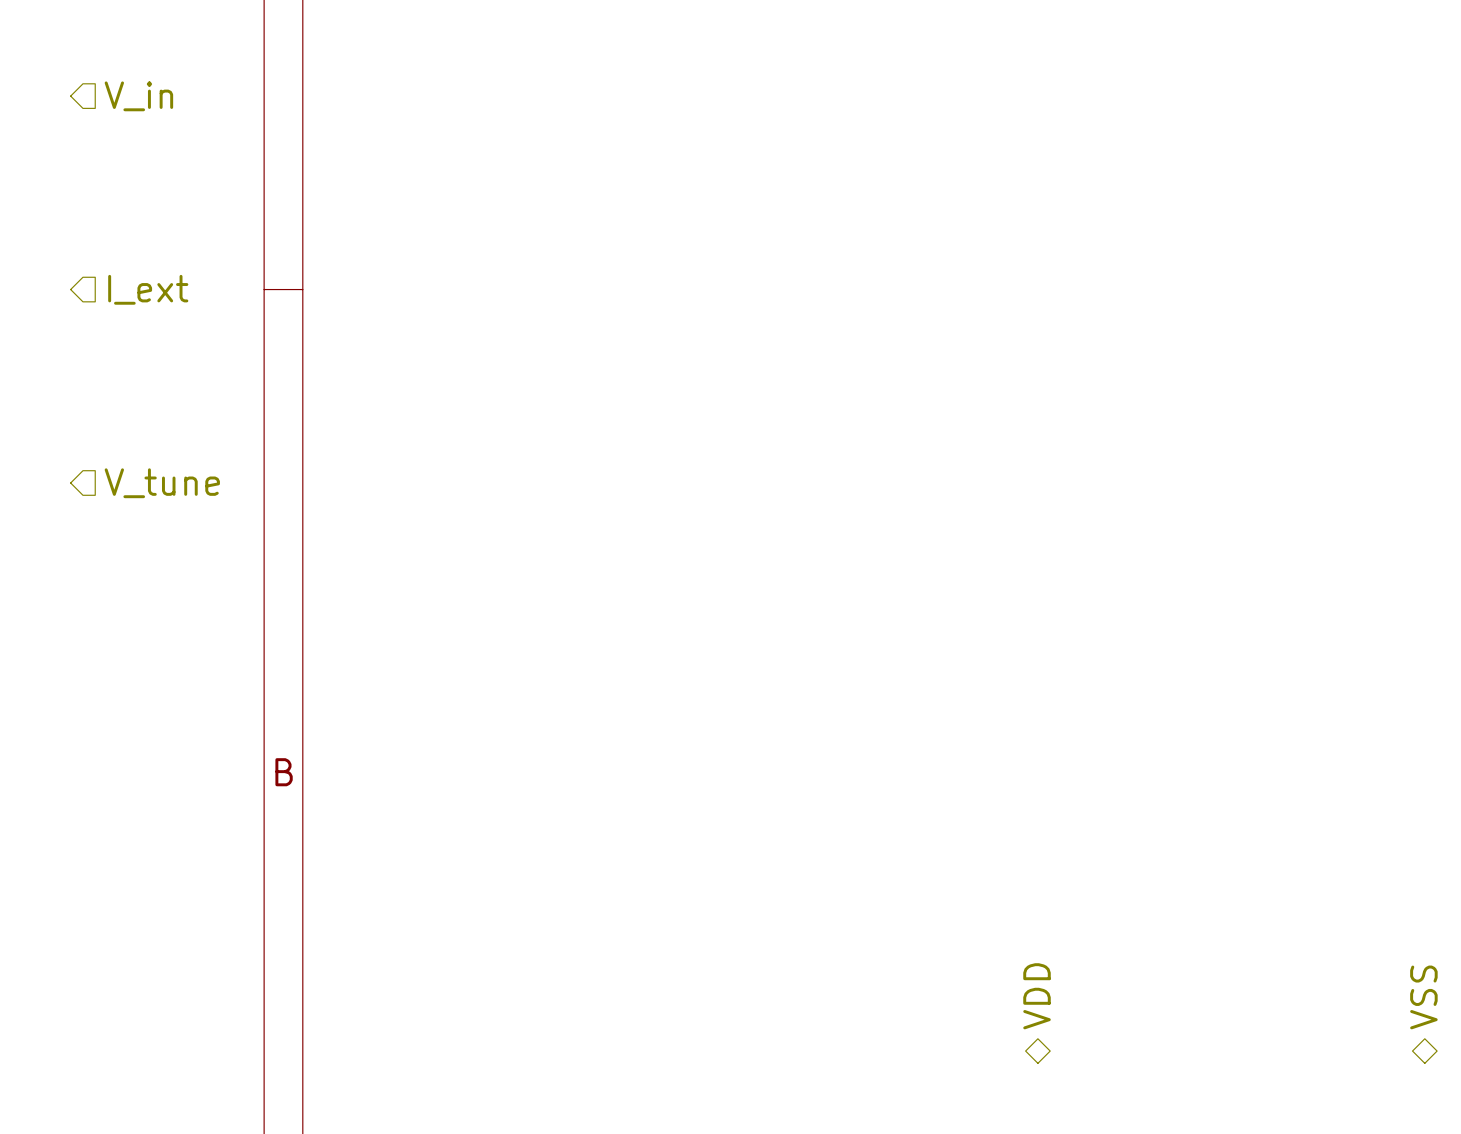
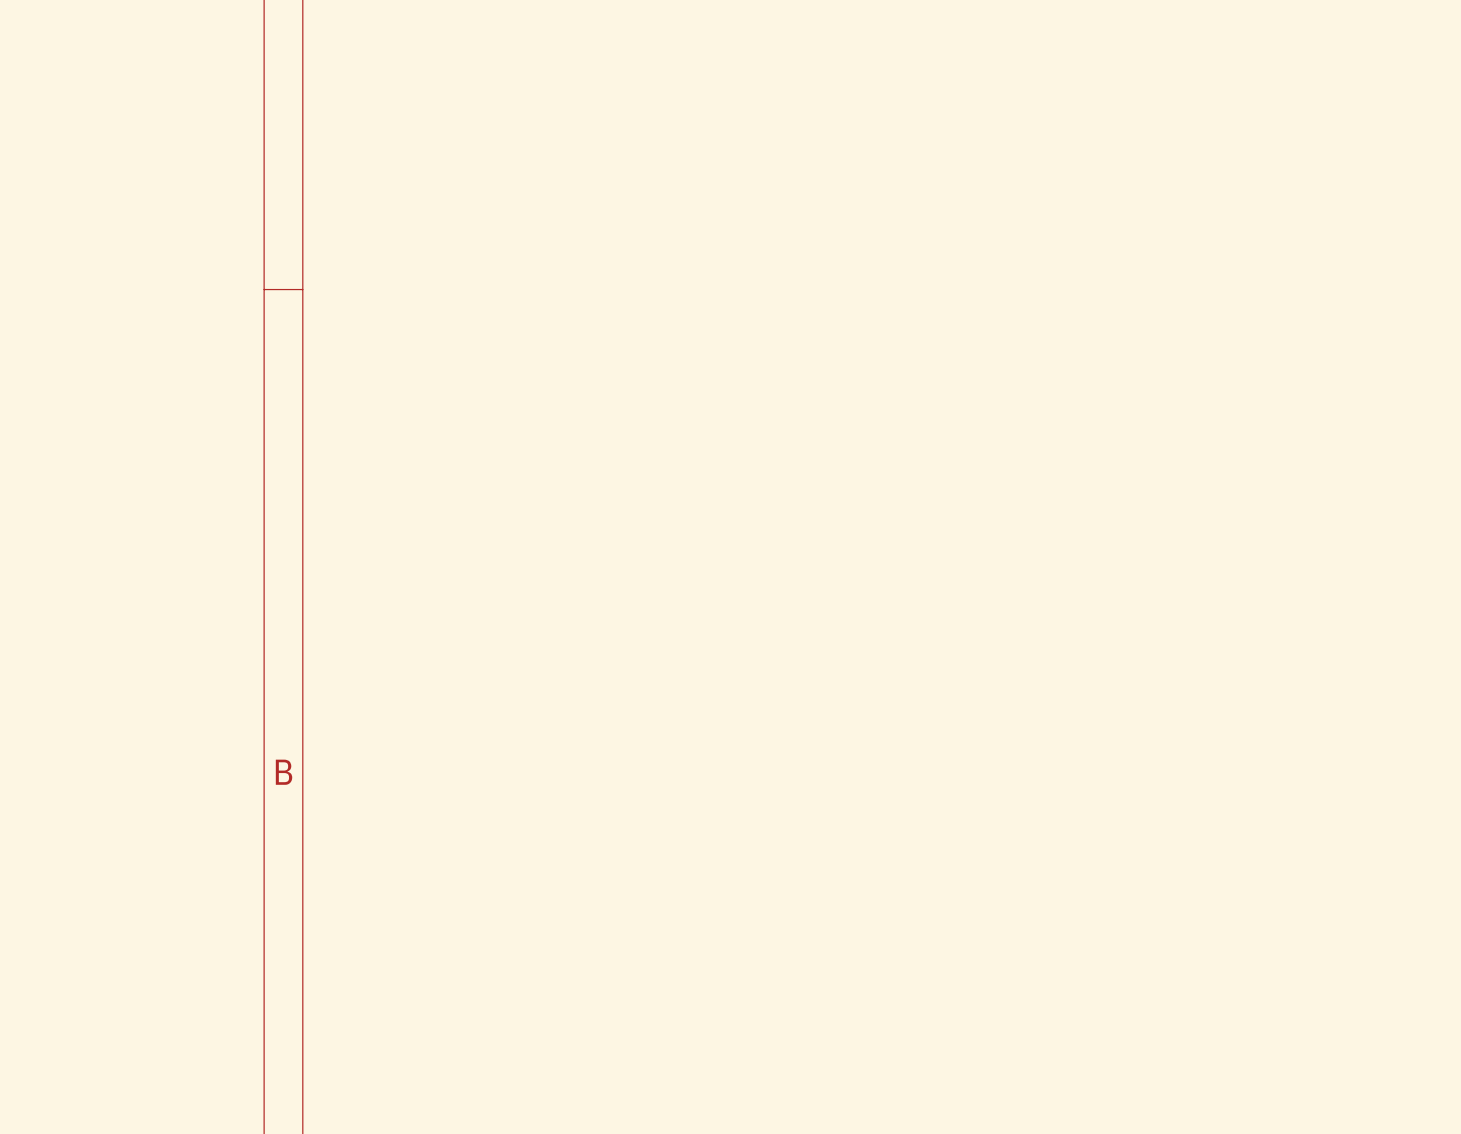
hierarchical label: V_in (138, 96) -> none
hierarchical label: I_ext (148, 289) -> none
hierarchical label: V_tune (162, 483) -> none
hierarchical label: VDD (1037, 996) -> none
hierarchical label: VSS (1423, 997) -> none

